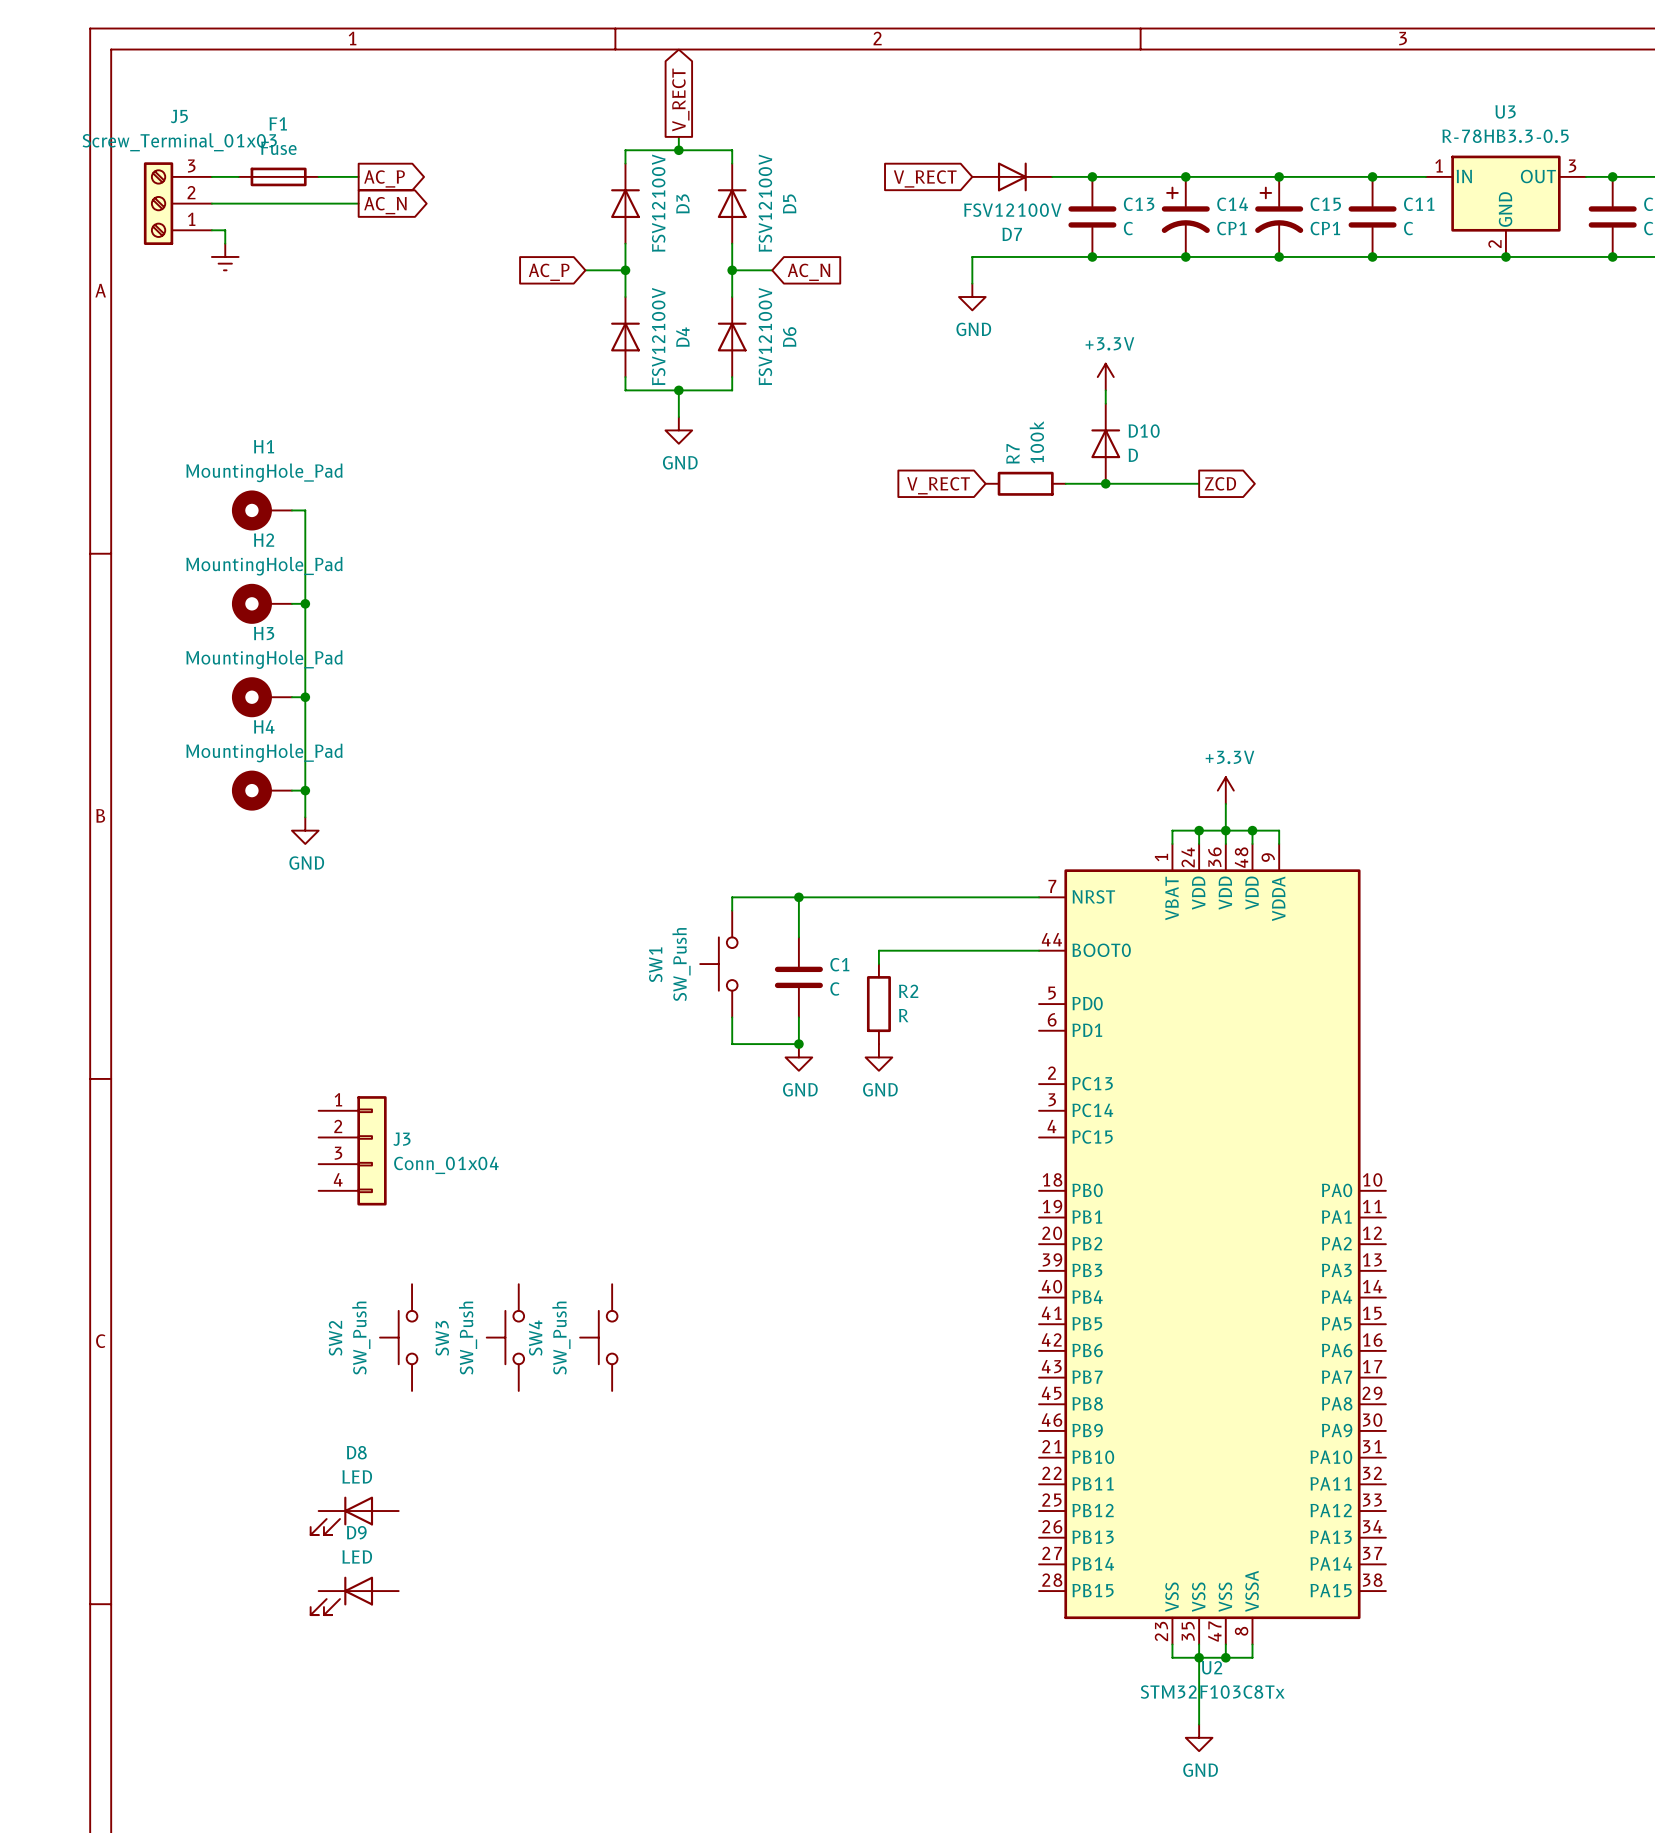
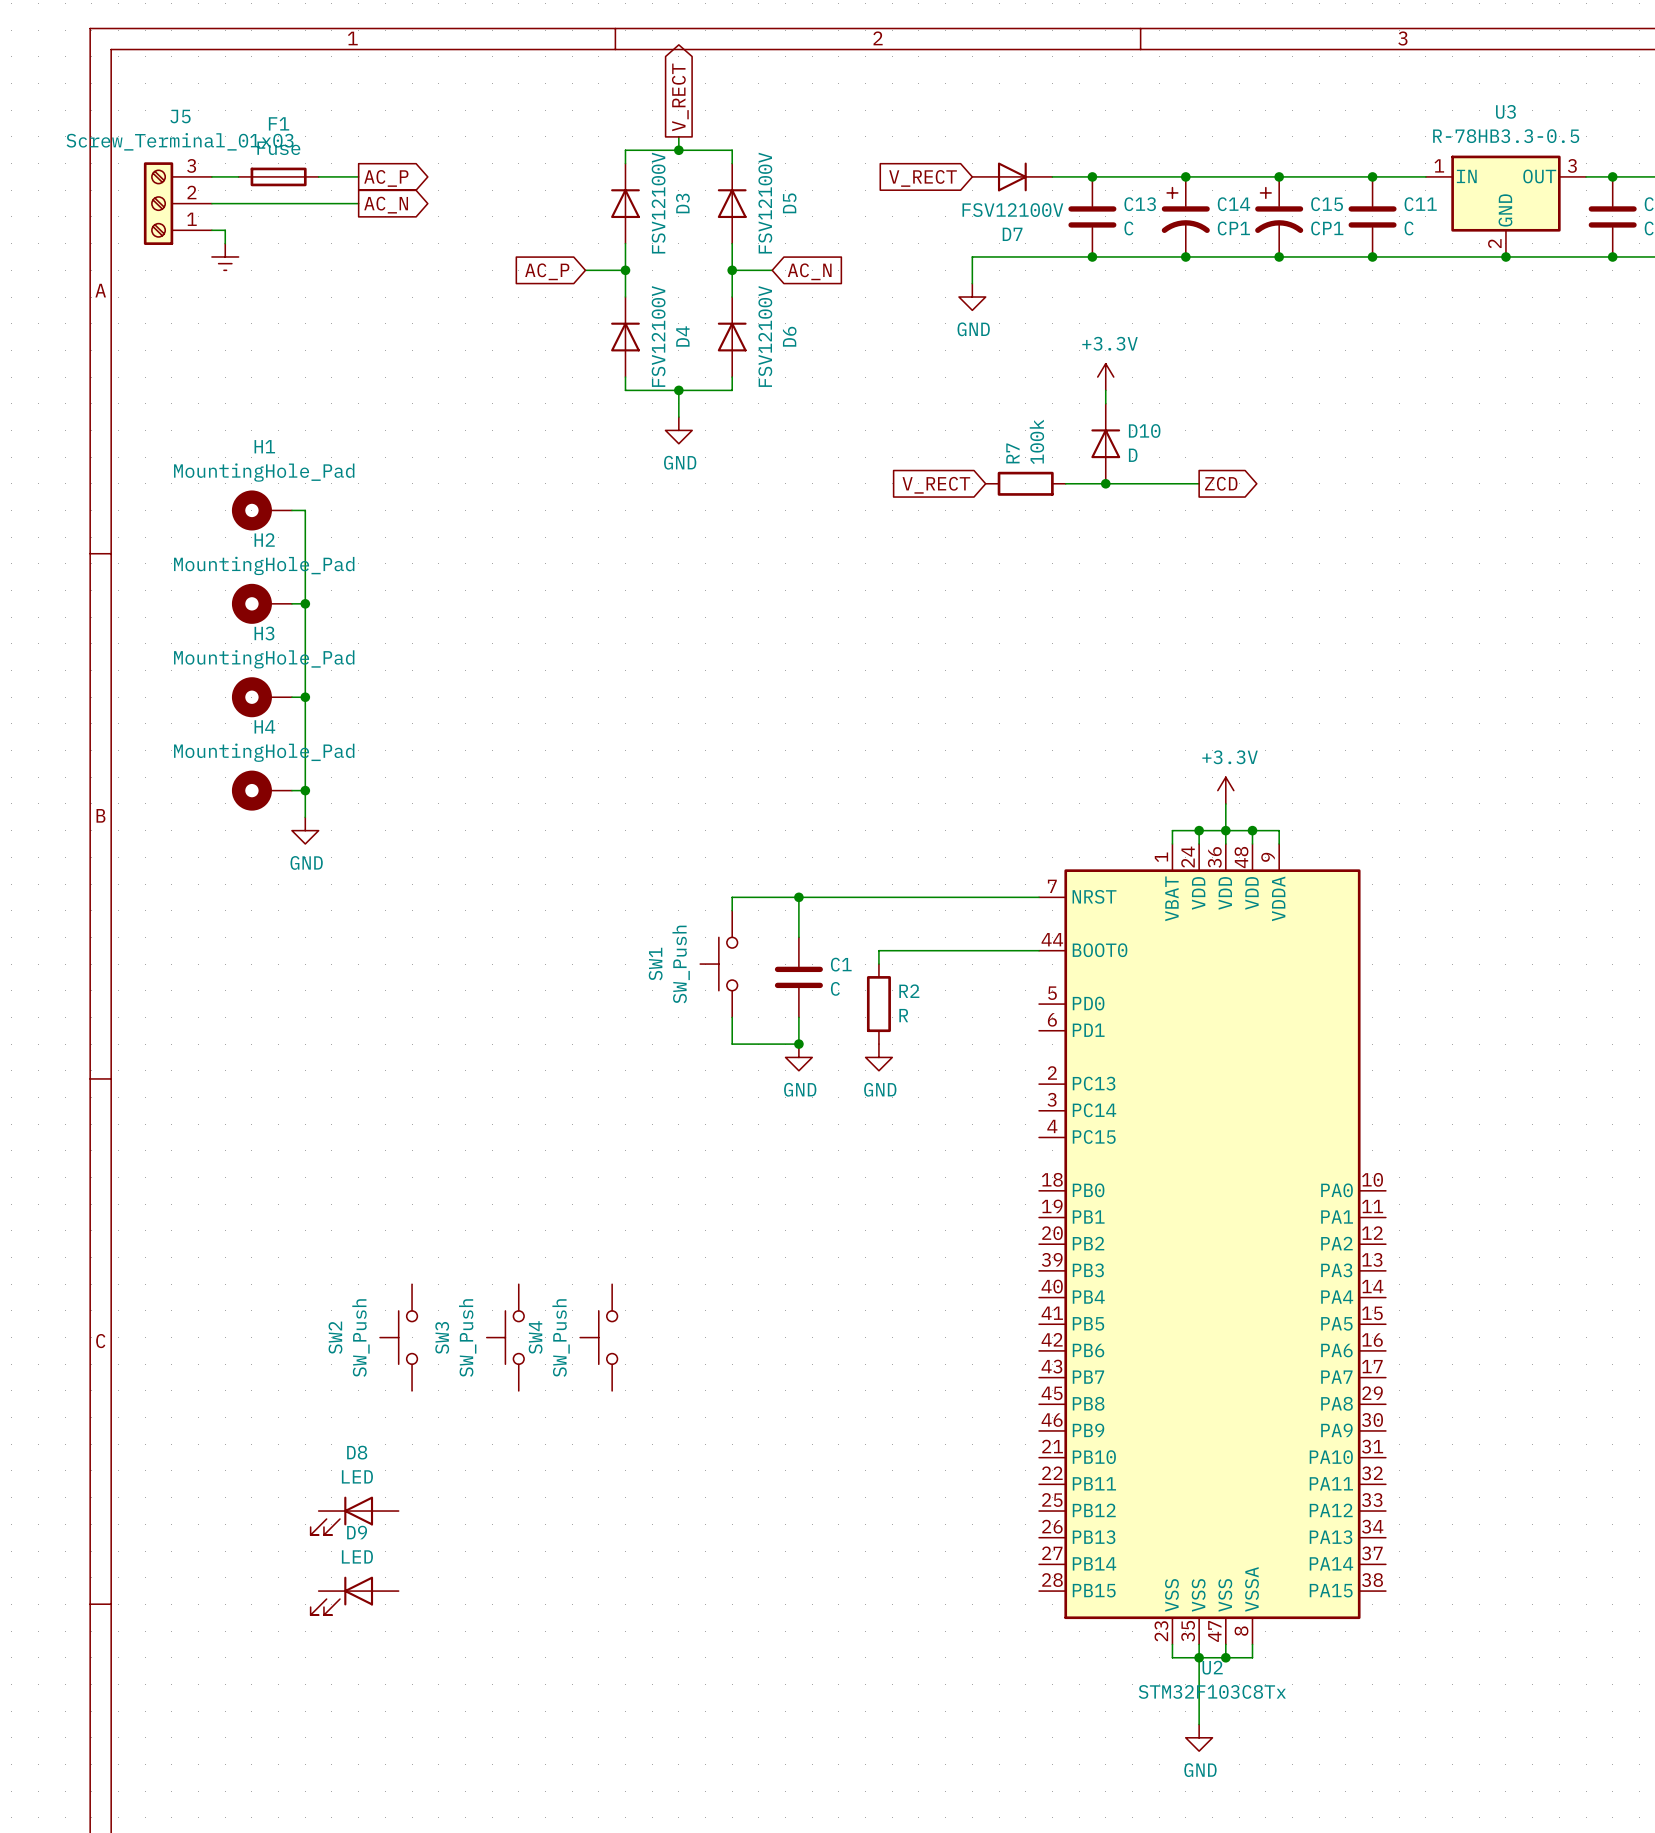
J3: Conn_01x04 (352, 1150) -> none

